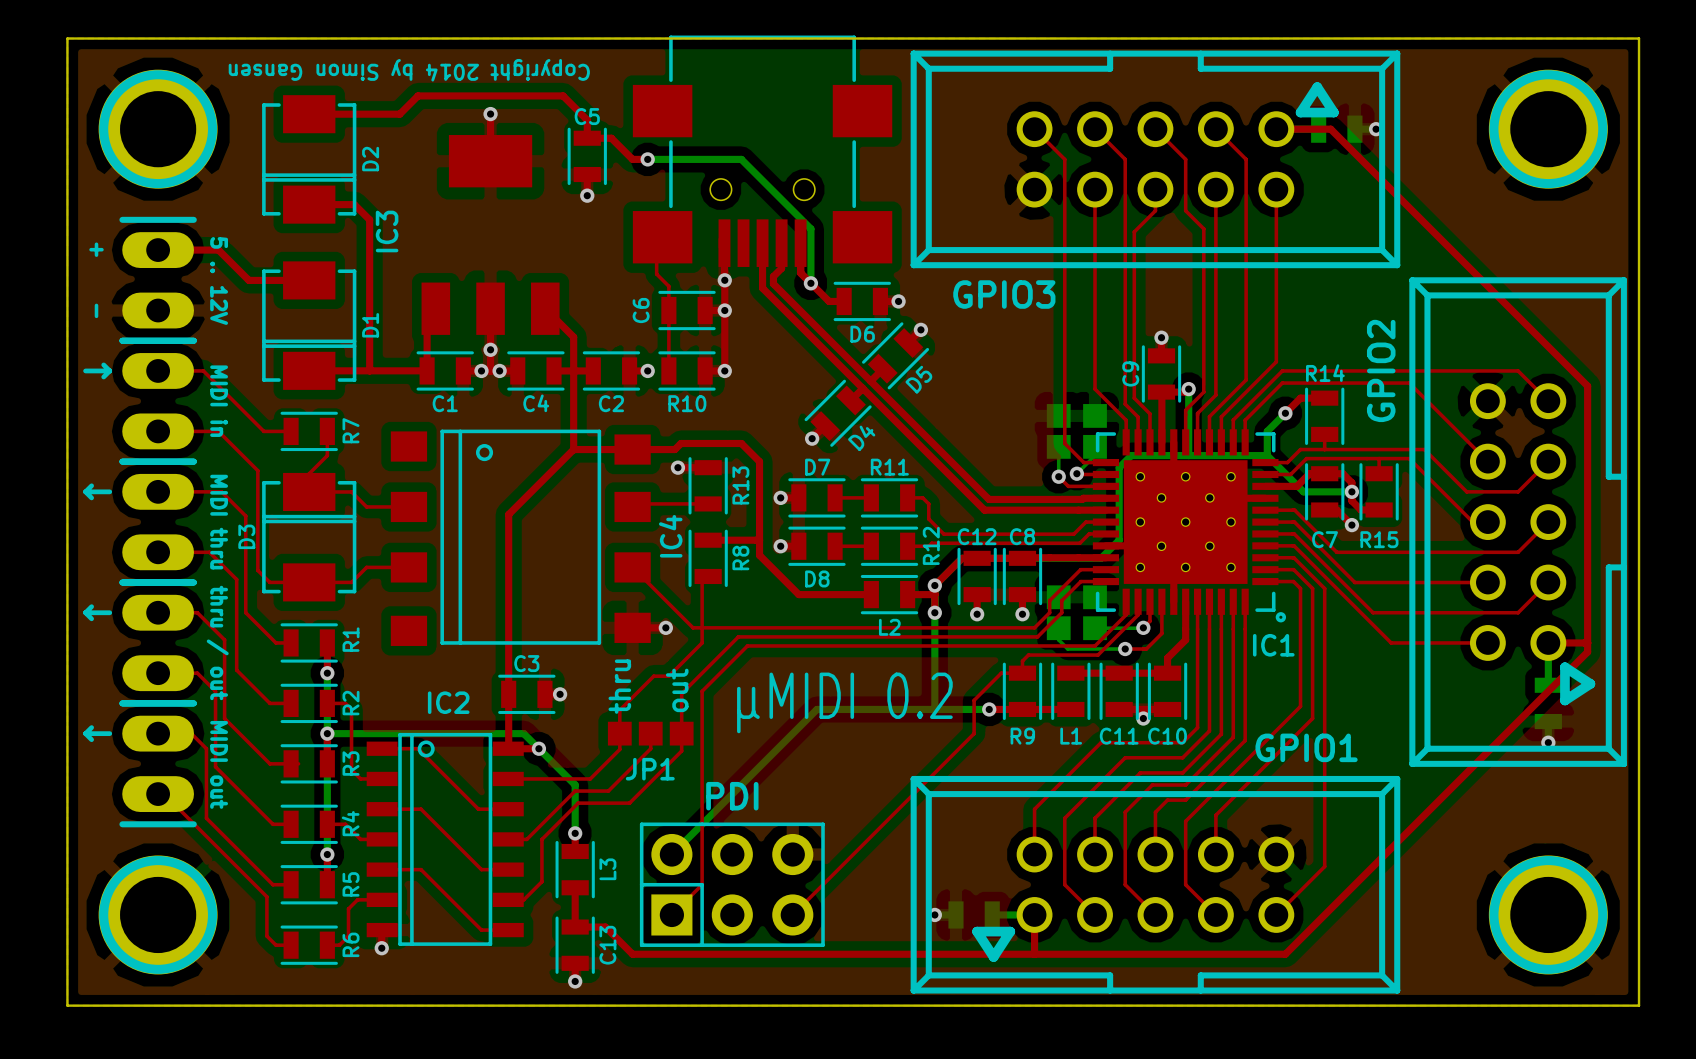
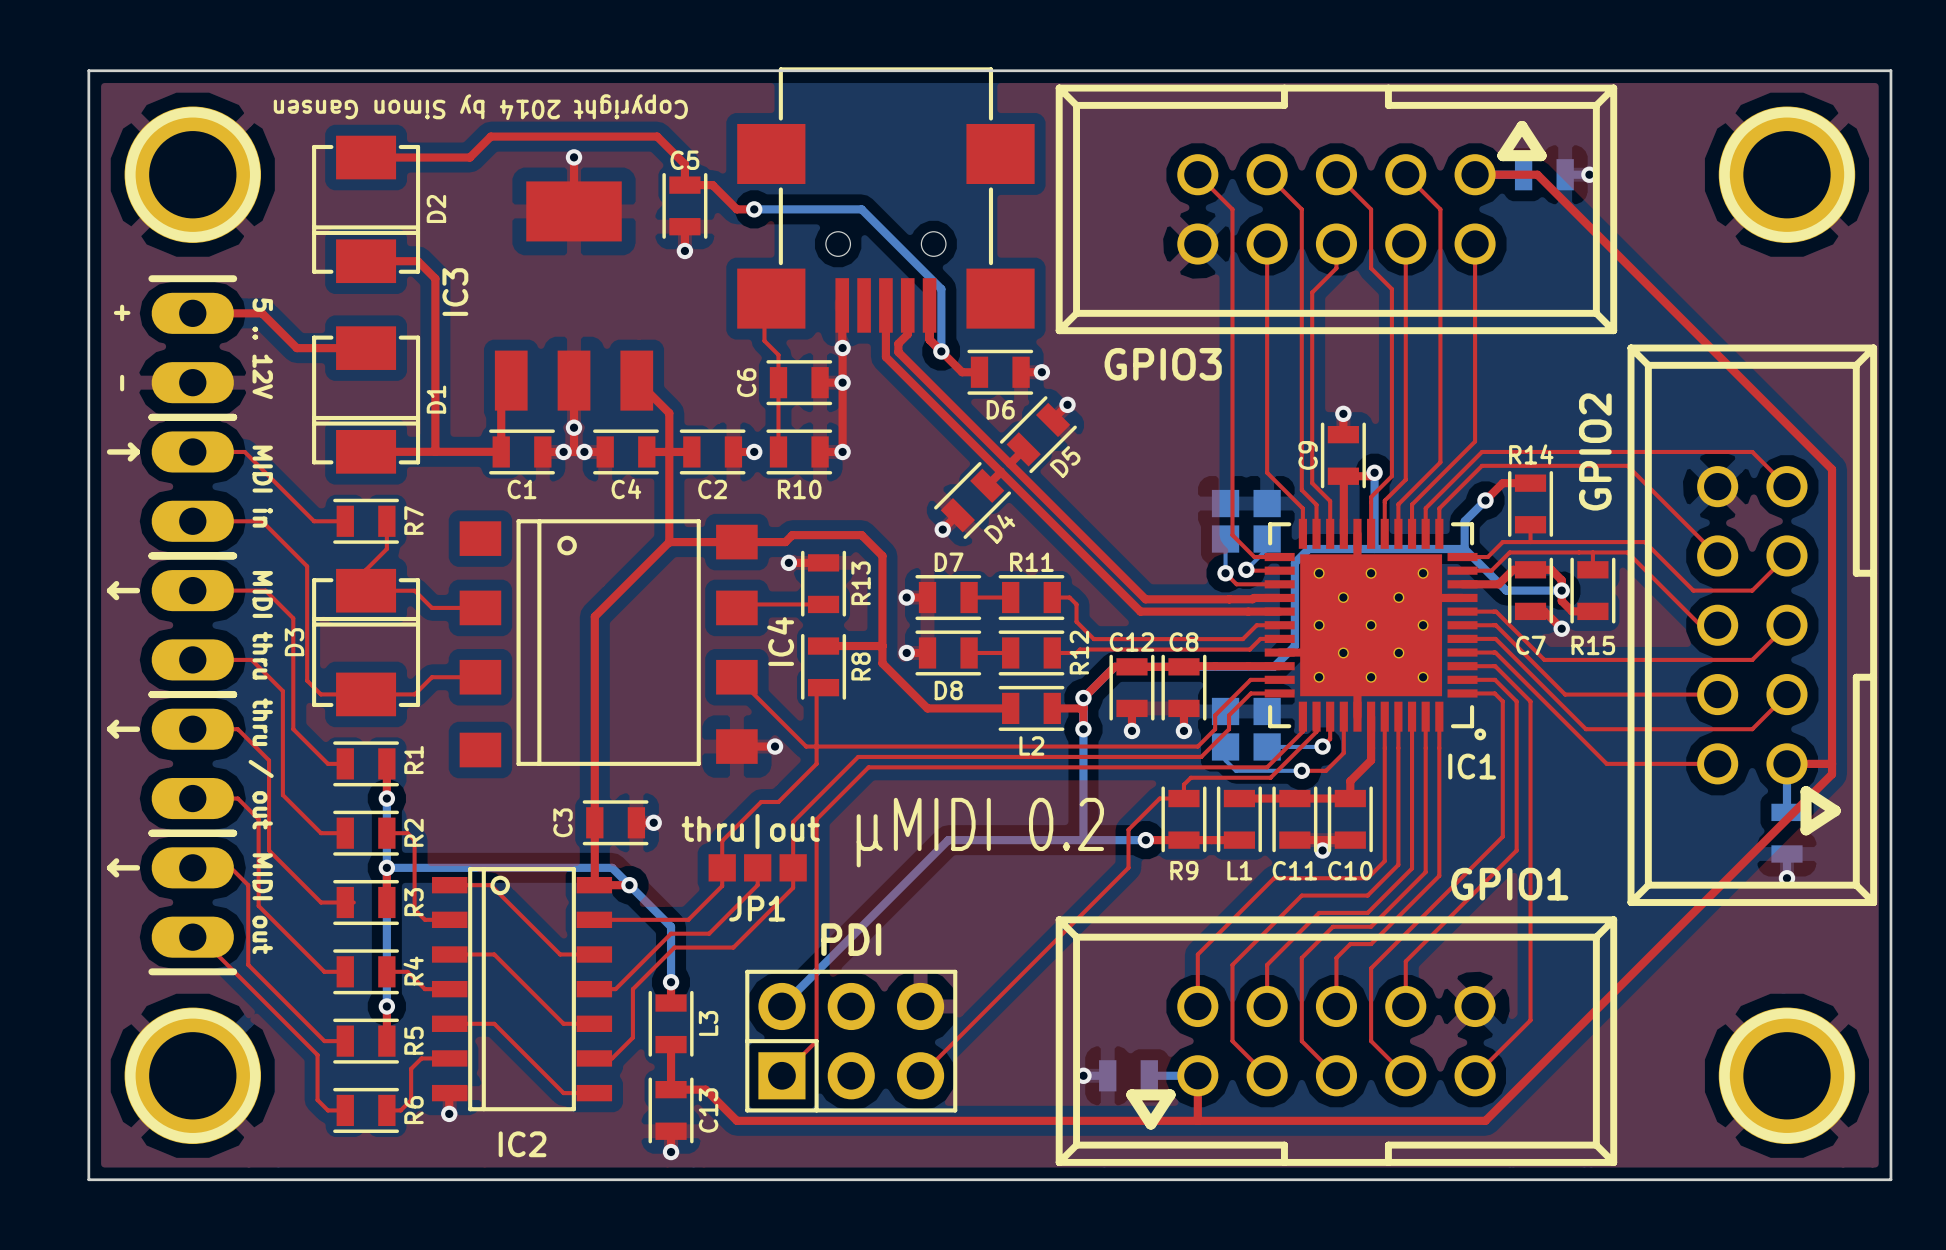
C3 name rotation: 0° (526, 663) -> 90° counterclockwise (563, 822)
C3 name position: C3 (526, 663) -> C3 (563, 822)
text: thru (619, 686) -> thru|out (750, 831)
text: out (677, 690) -> none
IC2 name position: IC2 (448, 702) -> IC2 (522, 1144)

